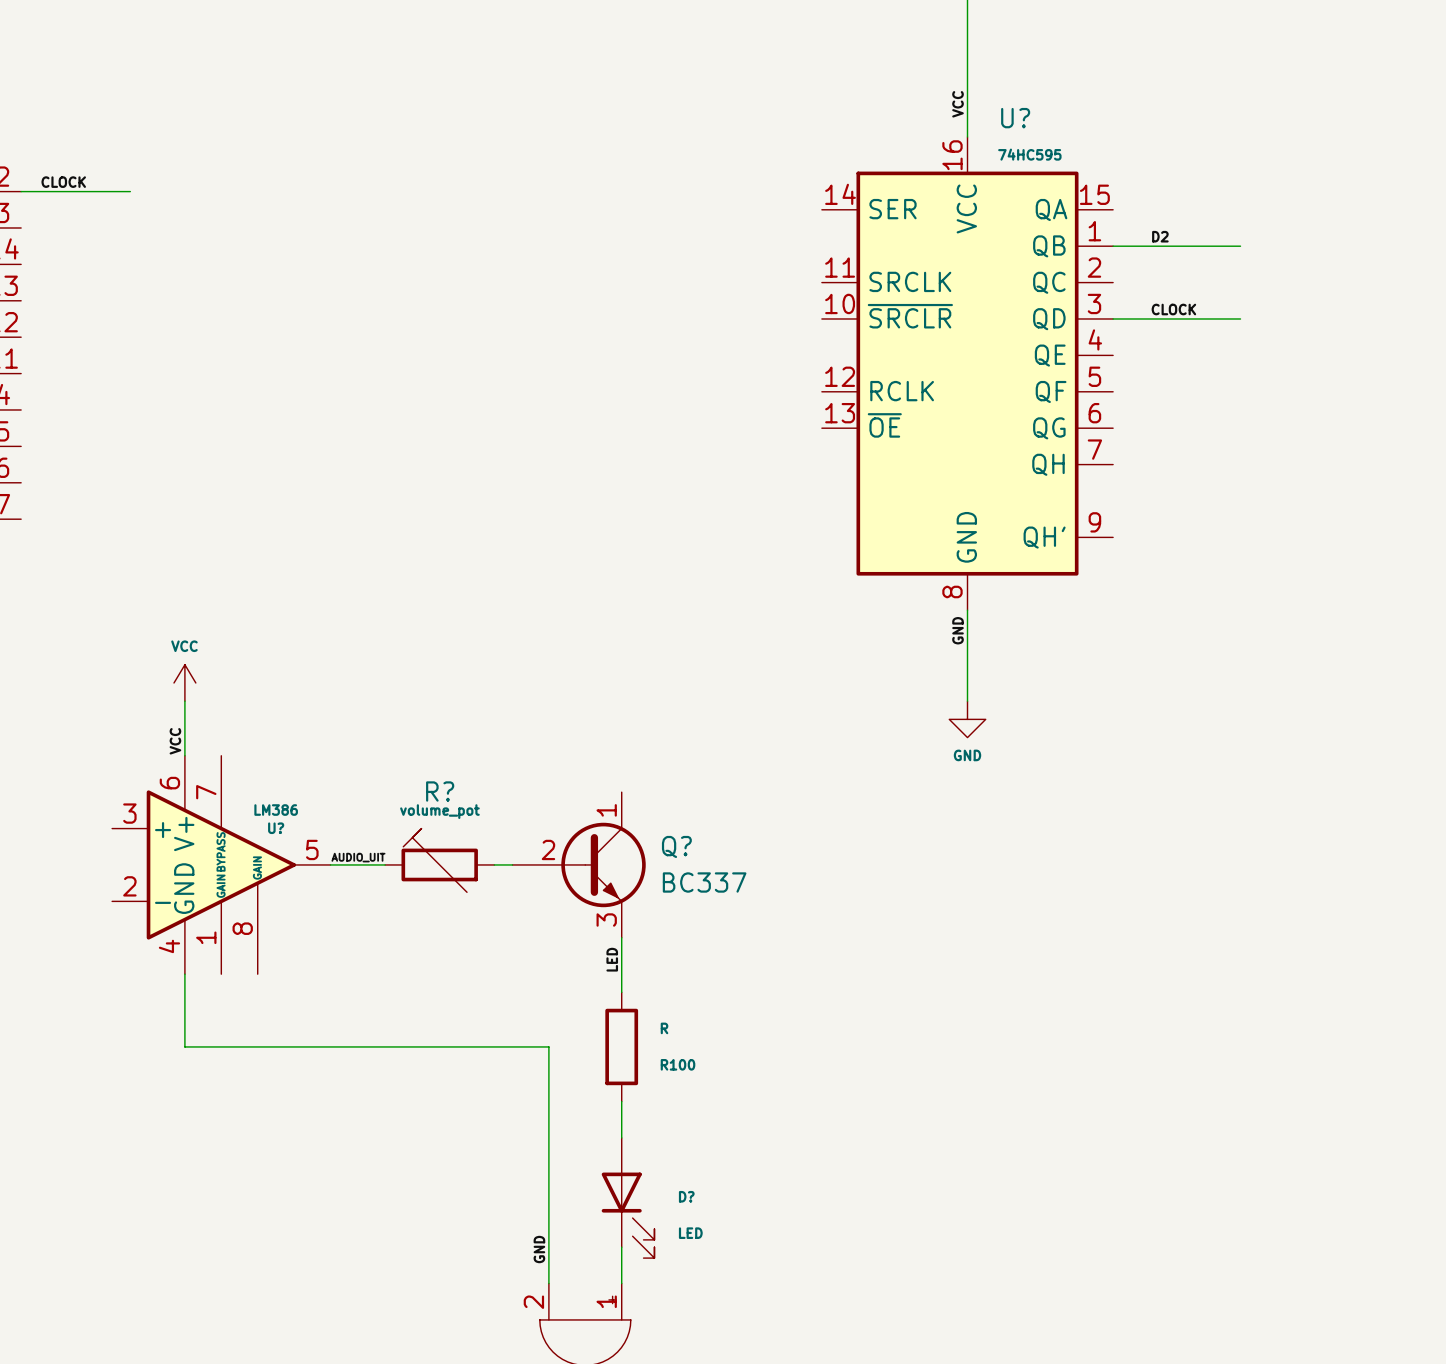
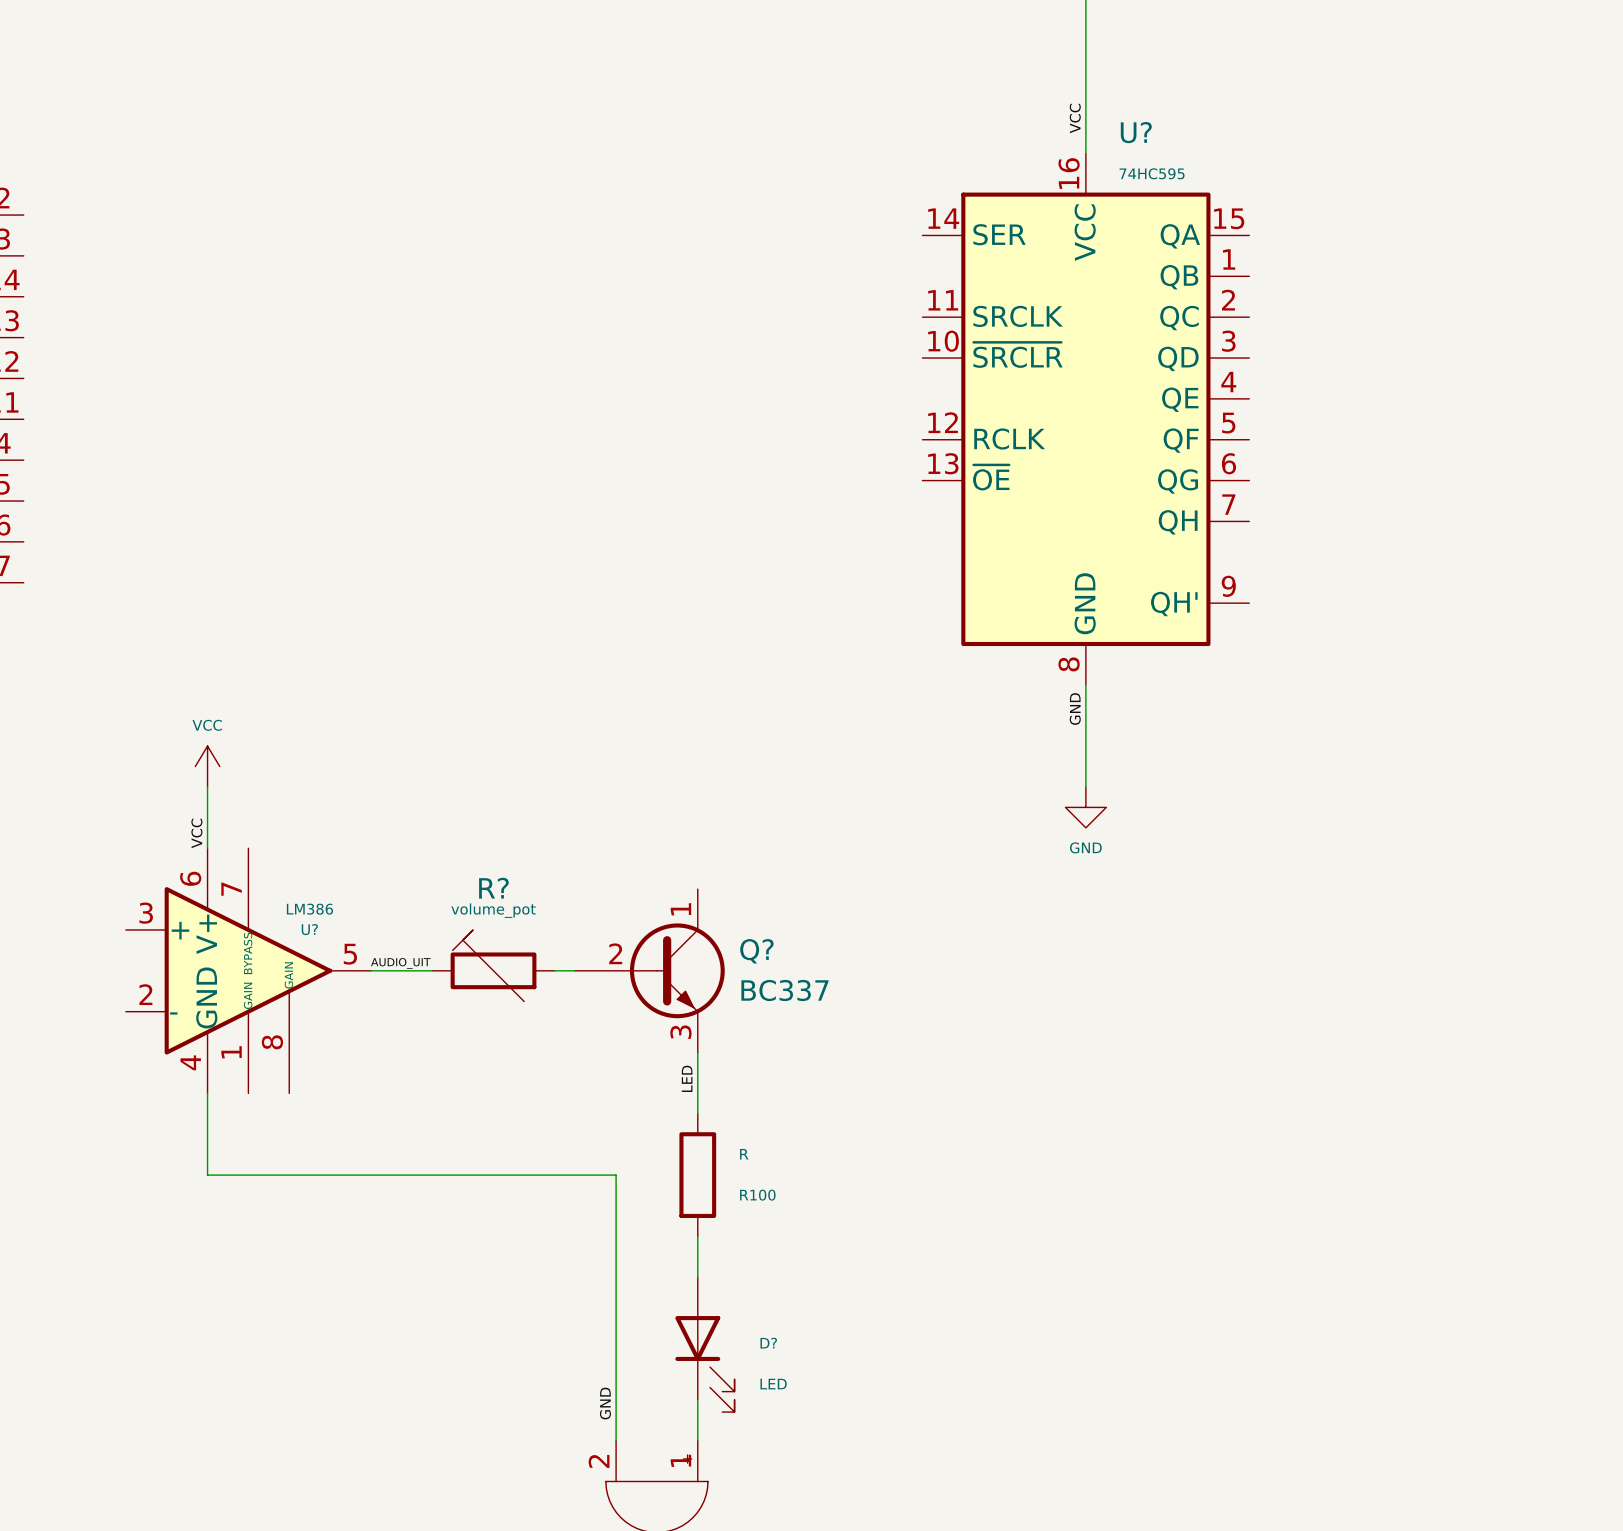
label: CLOCK (63, 182) -> none
wire: (21, 191) (130, 191) -> none
label: D2 (1160, 236) -> none
wire: (1113, 246) (1240, 246) -> none
label: CLOCK (1173, 309) -> none
wire: (1113, 318) (1240, 318) -> none

